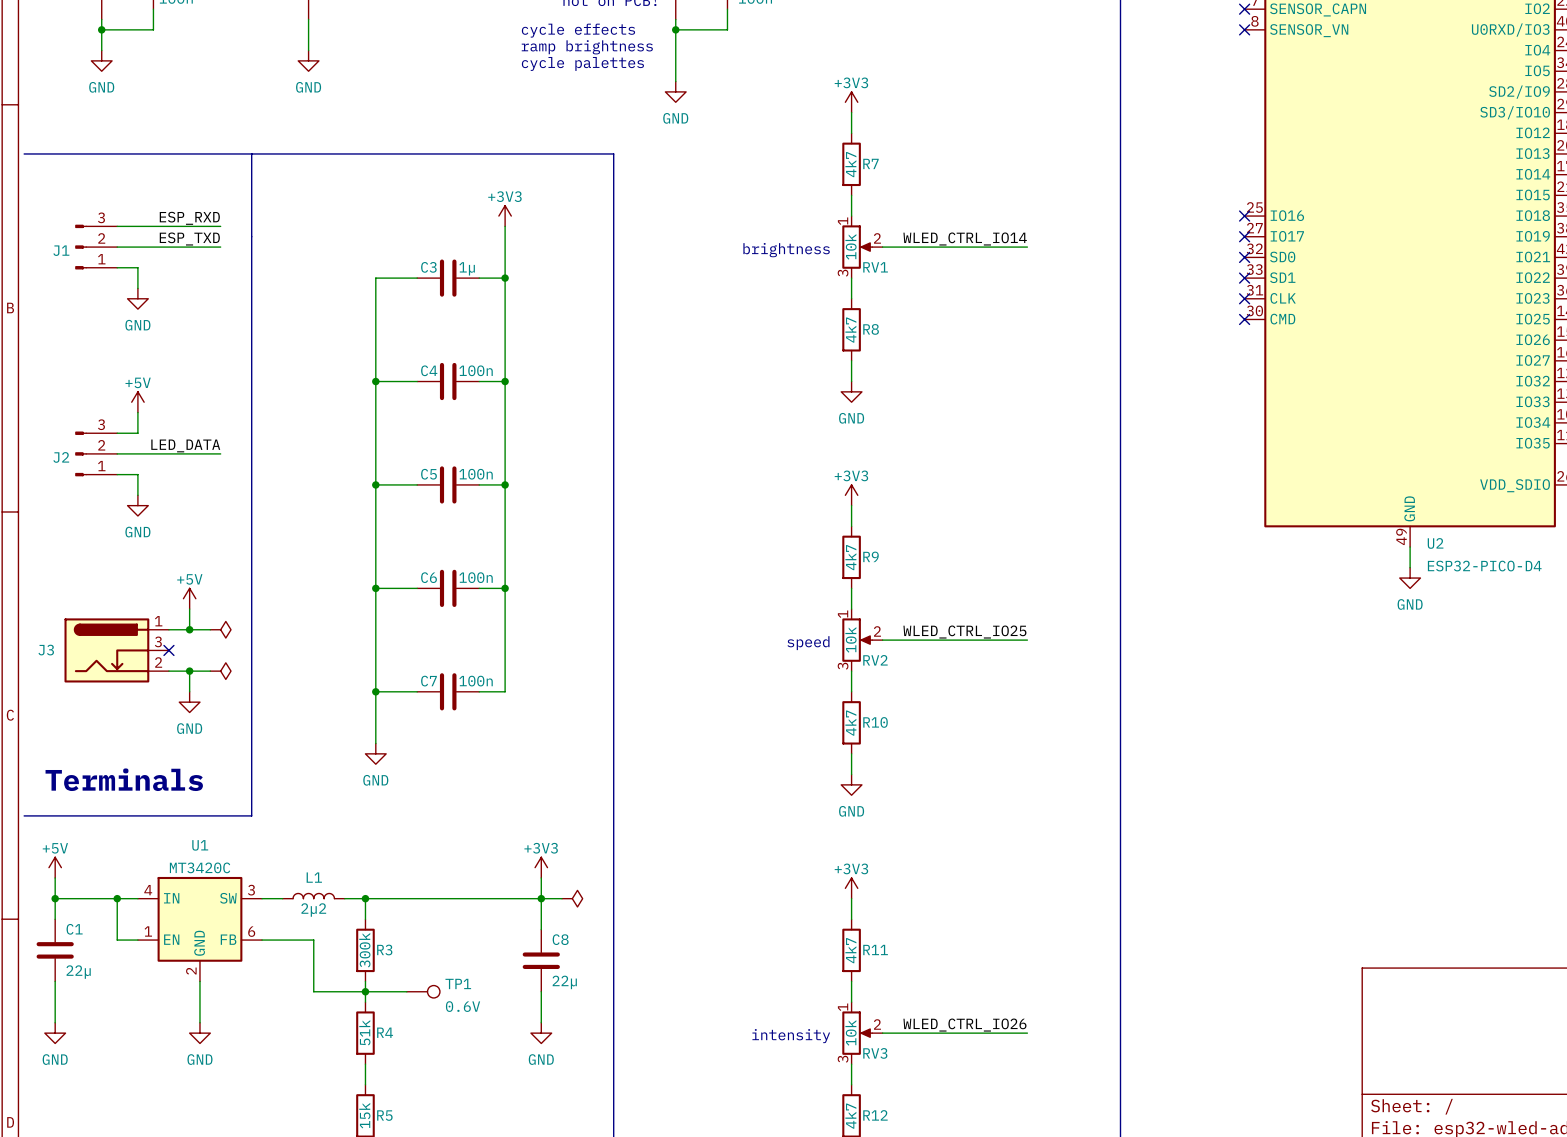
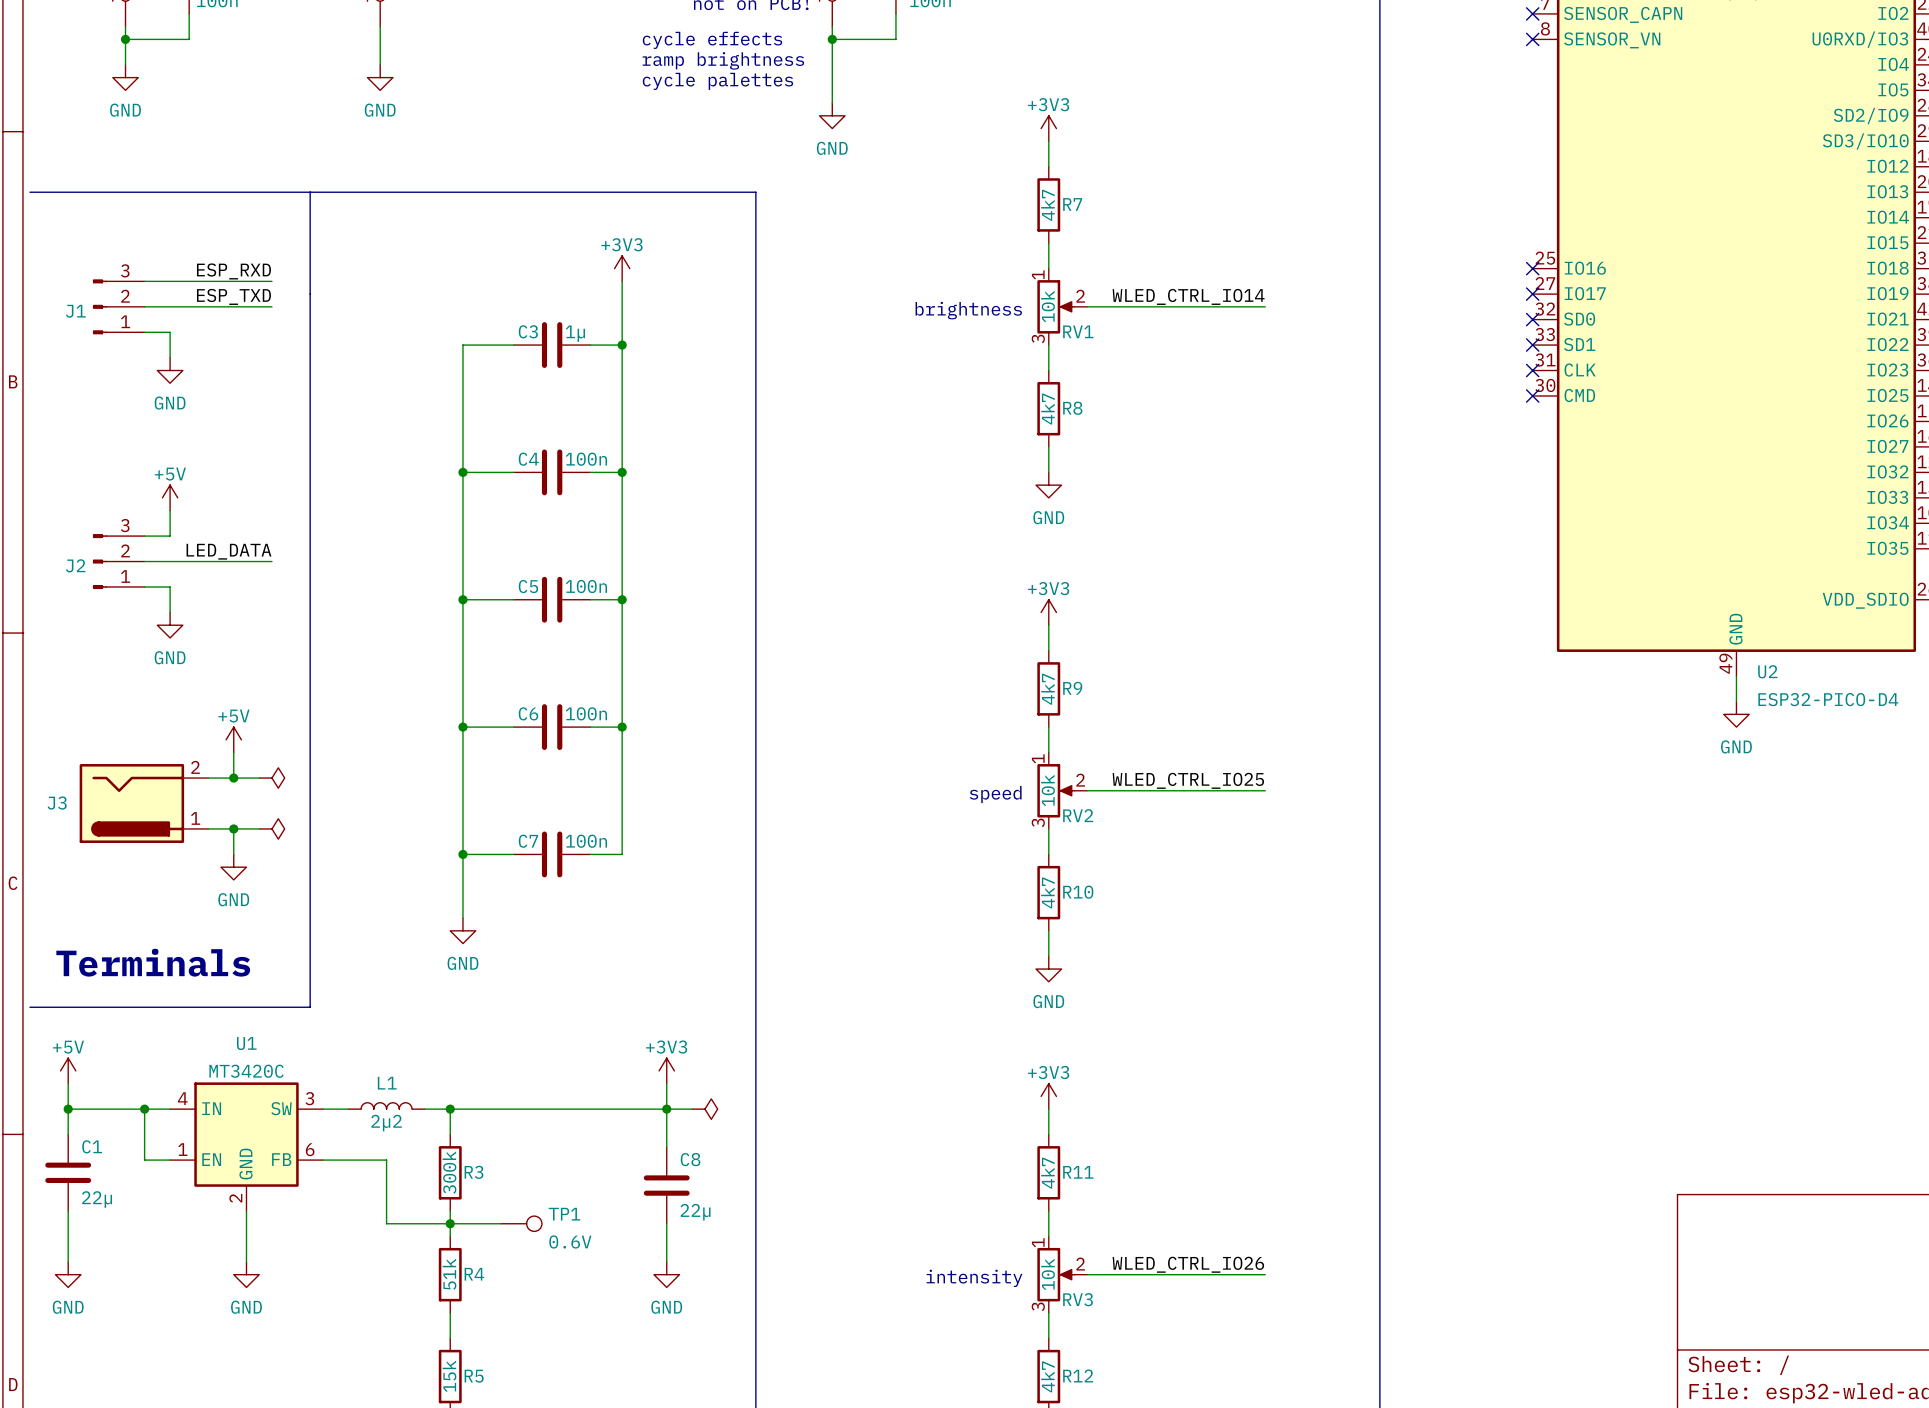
J3 symbol: [64, 618, 169, 683] -> [79, 764, 209, 843]
no-connect mark: (168, 650) -> none

